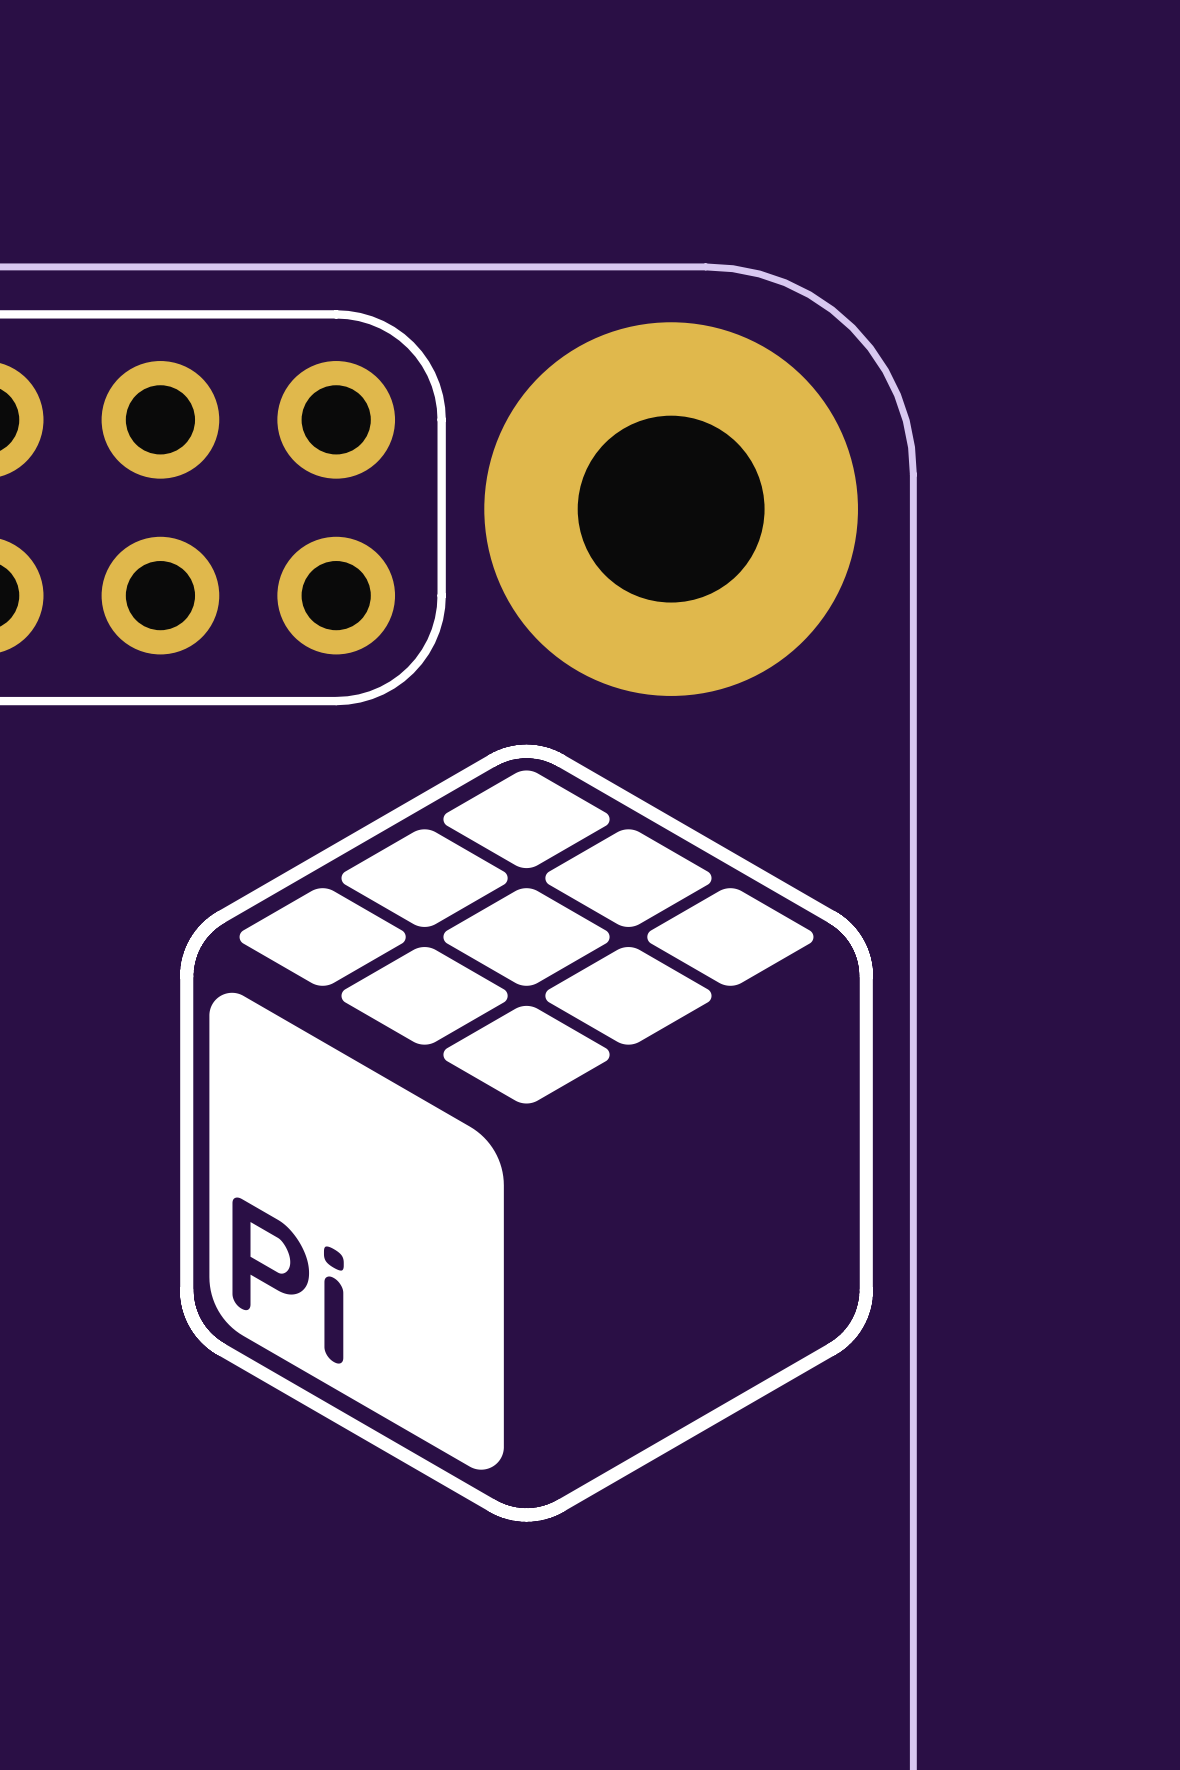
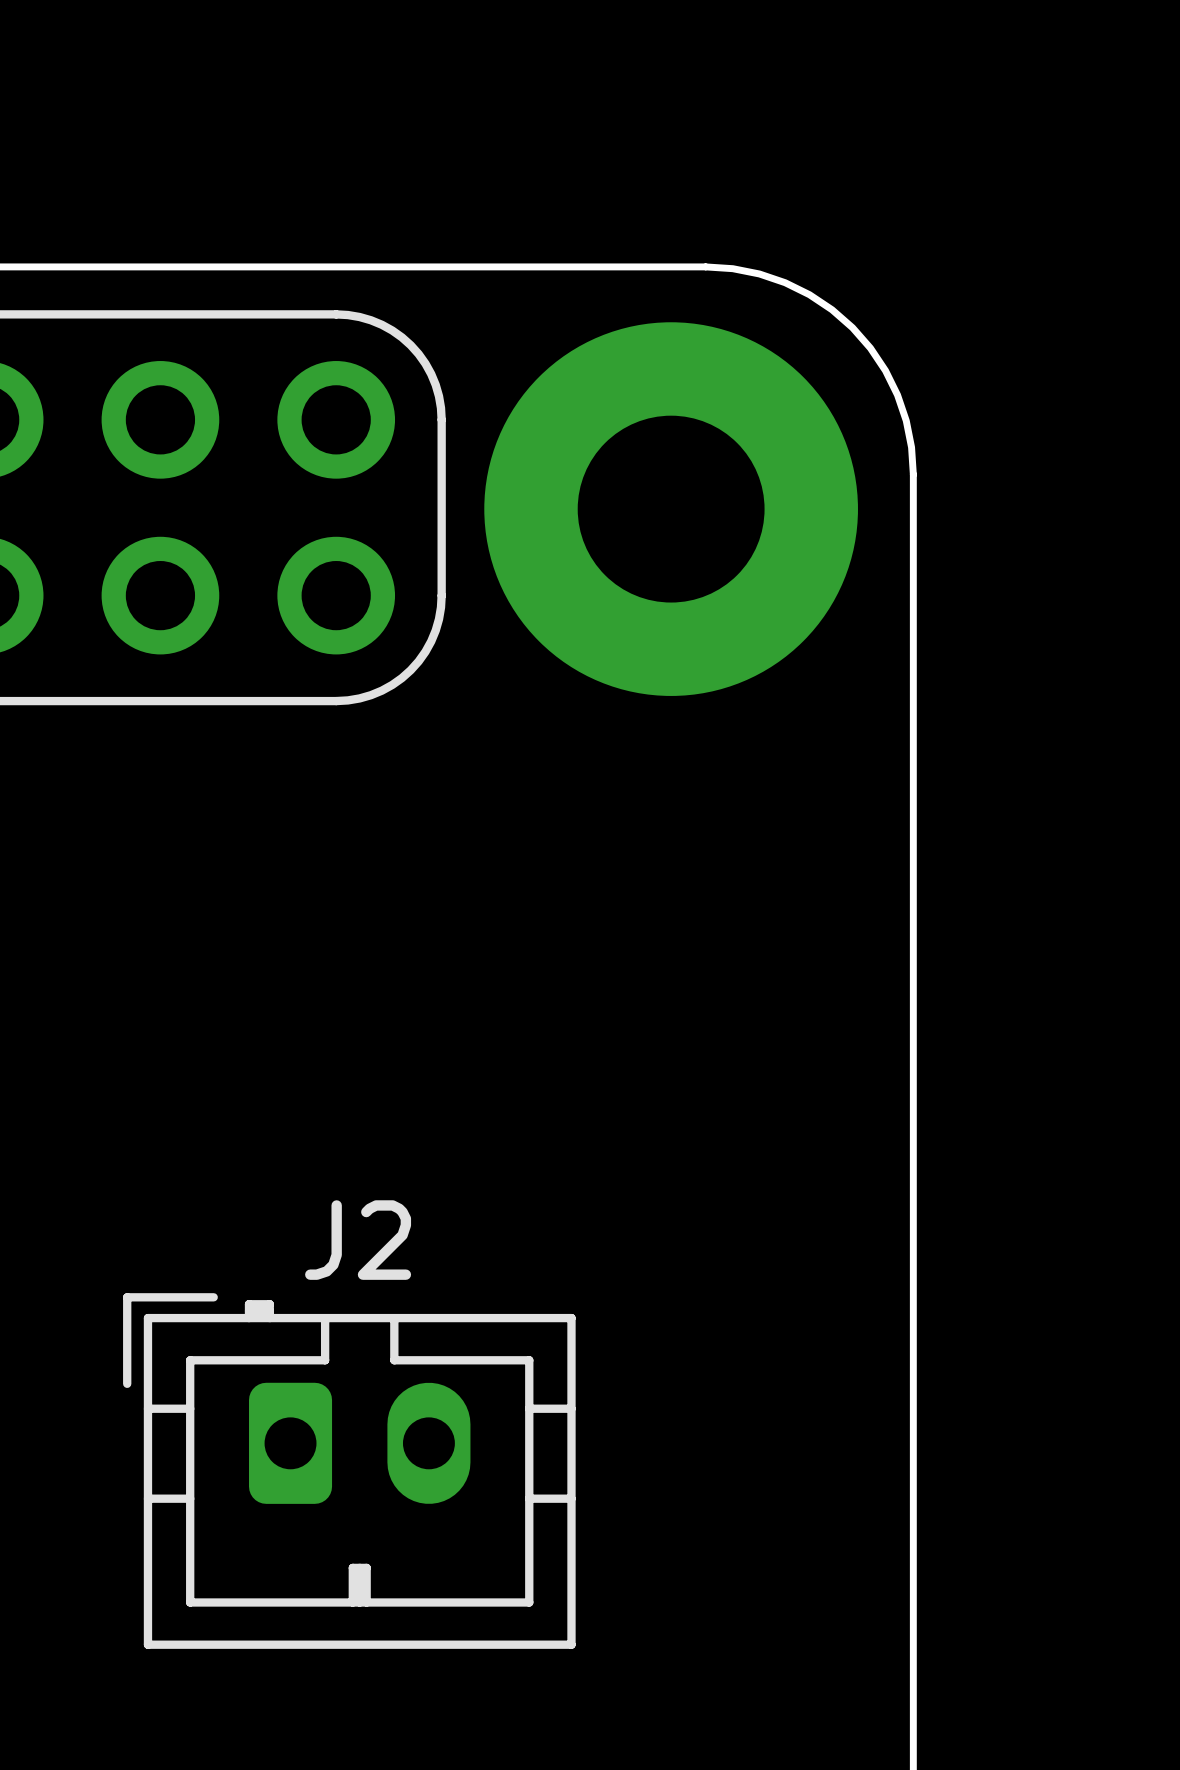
drawing: [180, 744, 873, 1522] -> none
J2: none -> (349, 1471)

